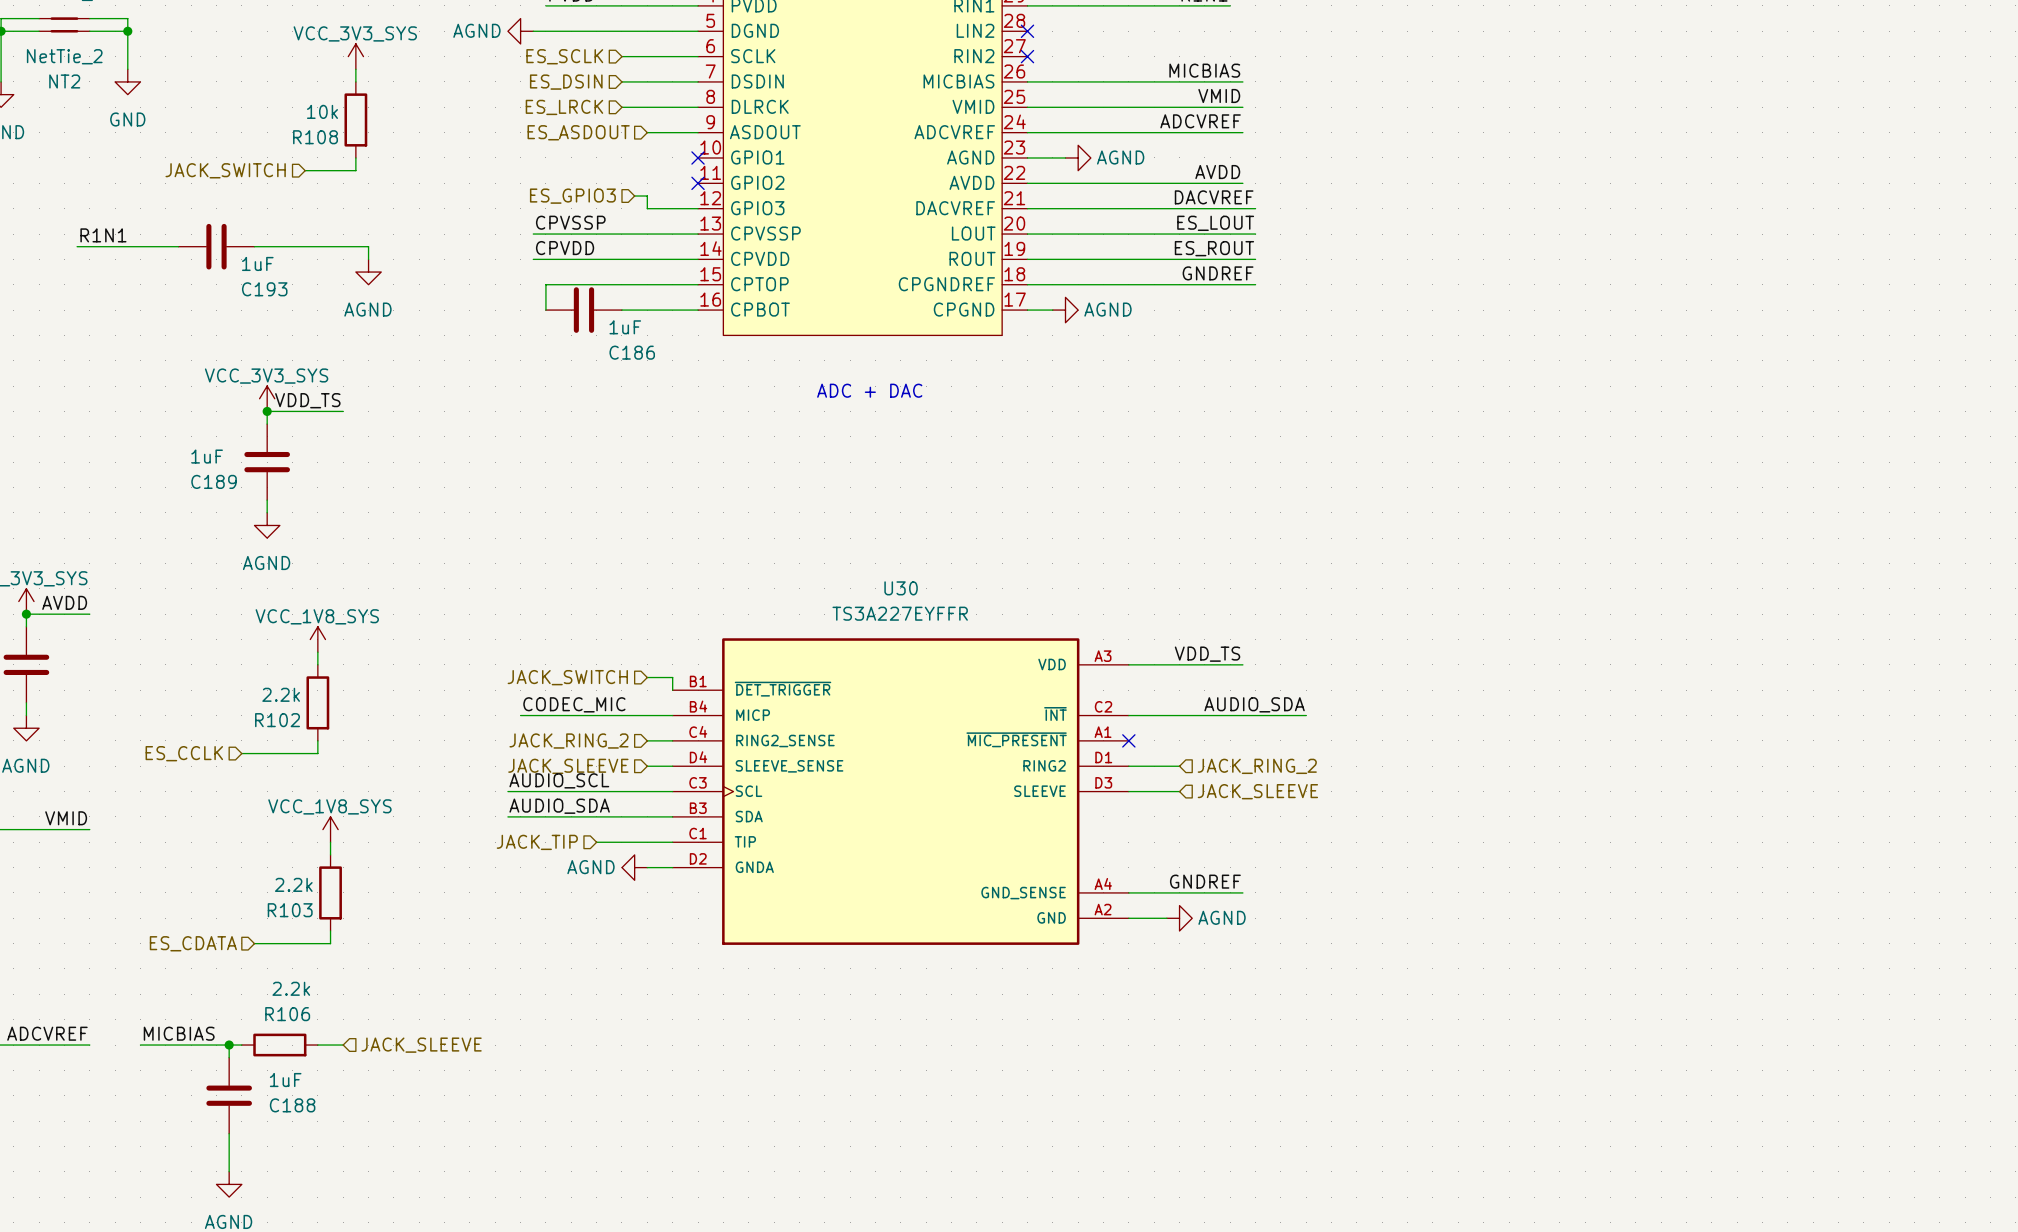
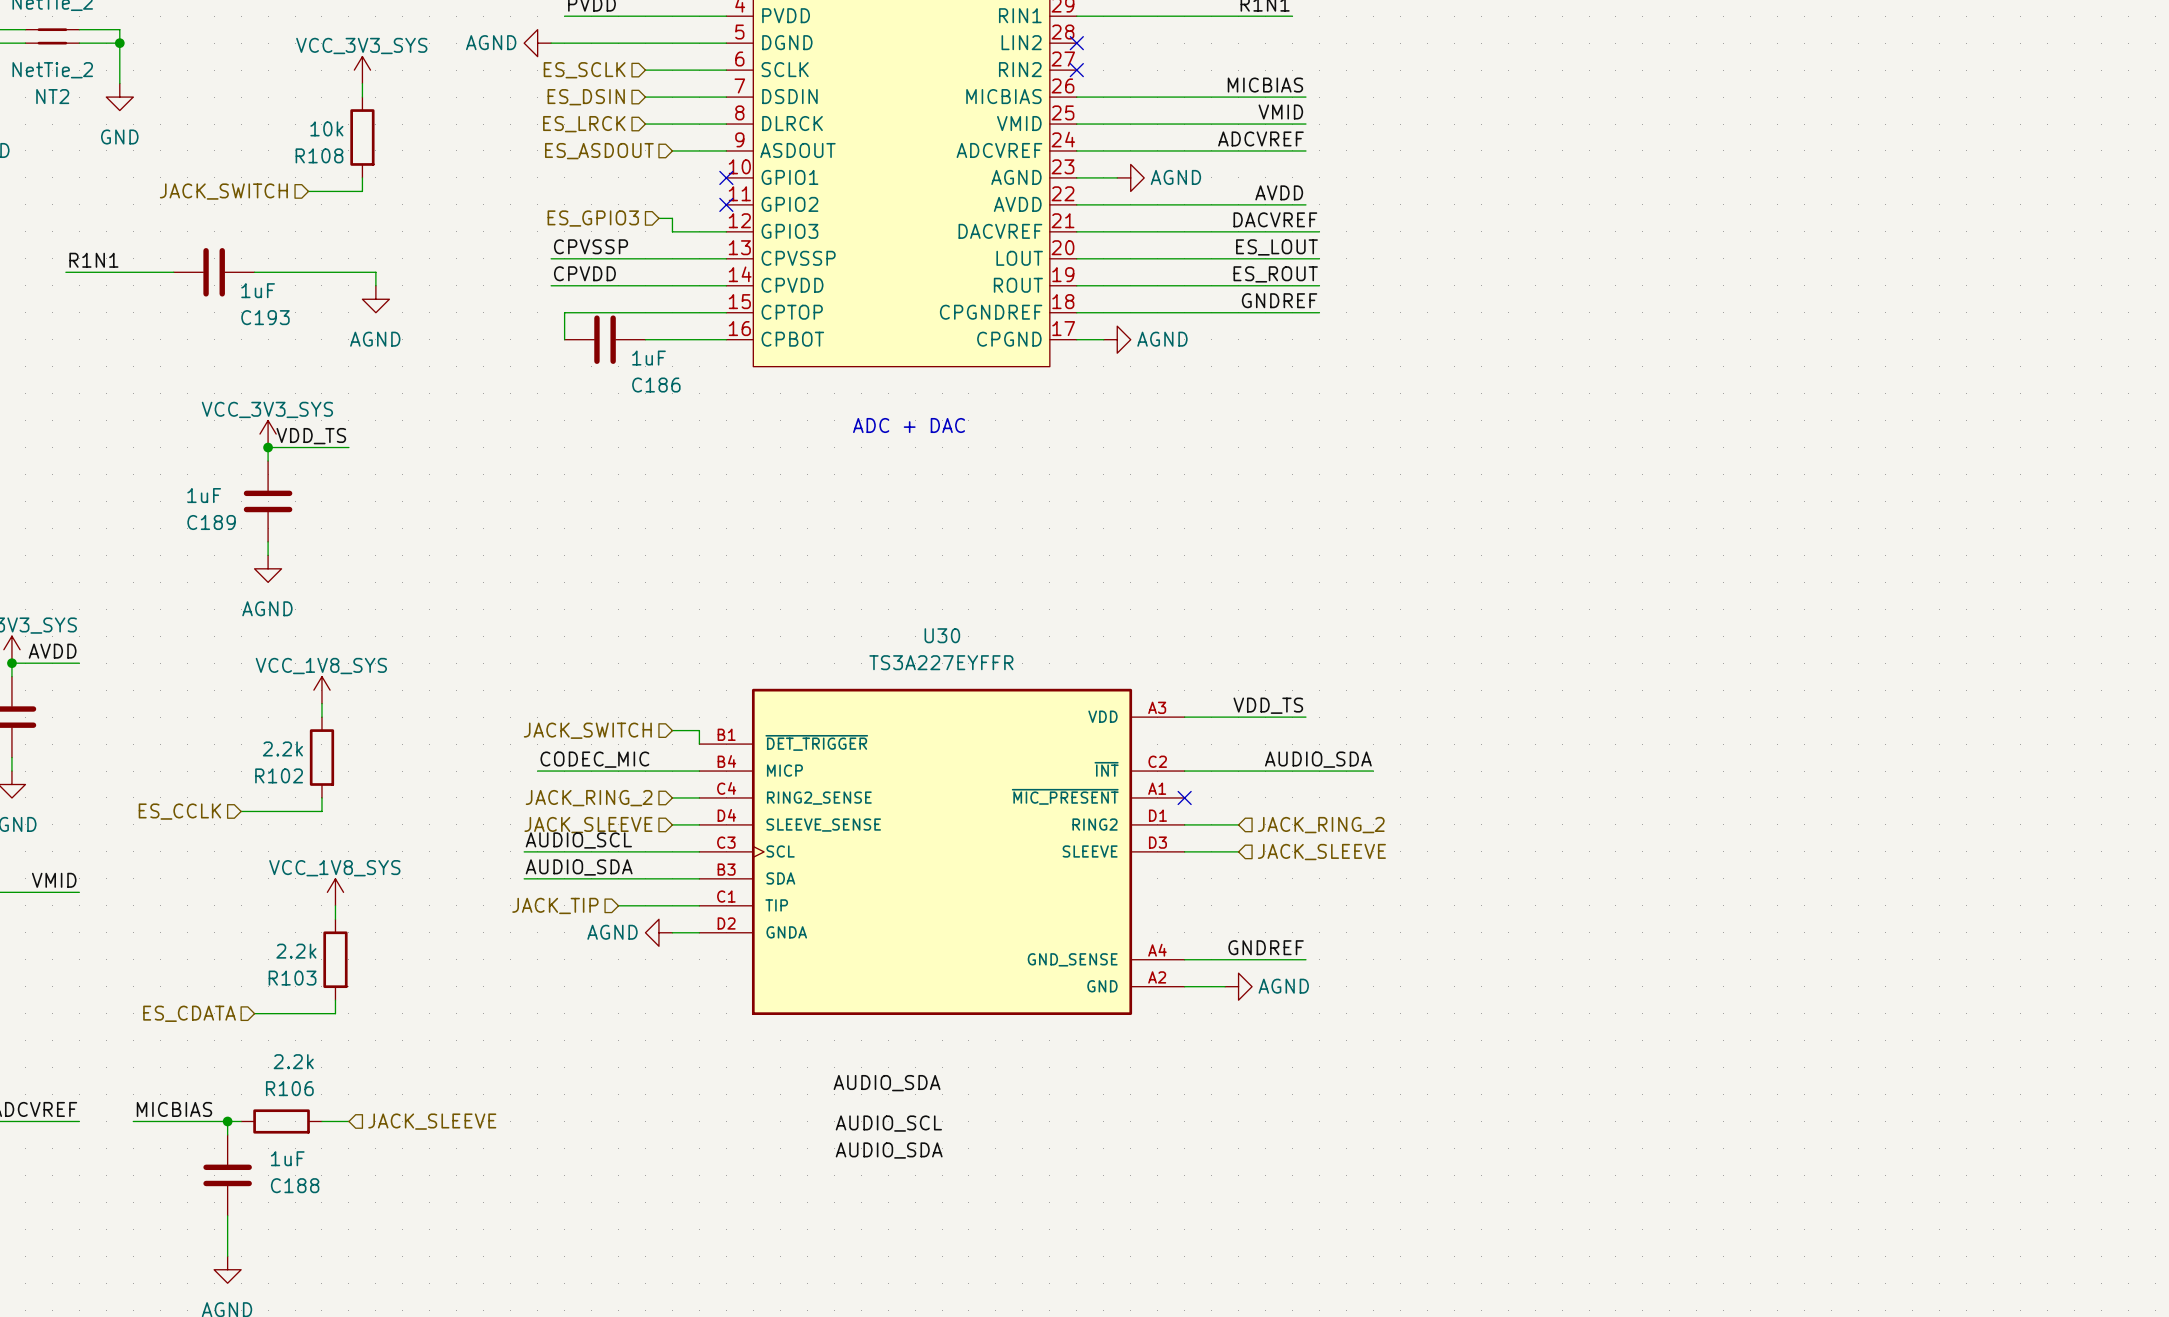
label: none -> AUDIO_SDA (887, 1083)
label: none -> AUDIO_SCL (888, 1123)
label: none -> AUDIO_SDA (889, 1150)

